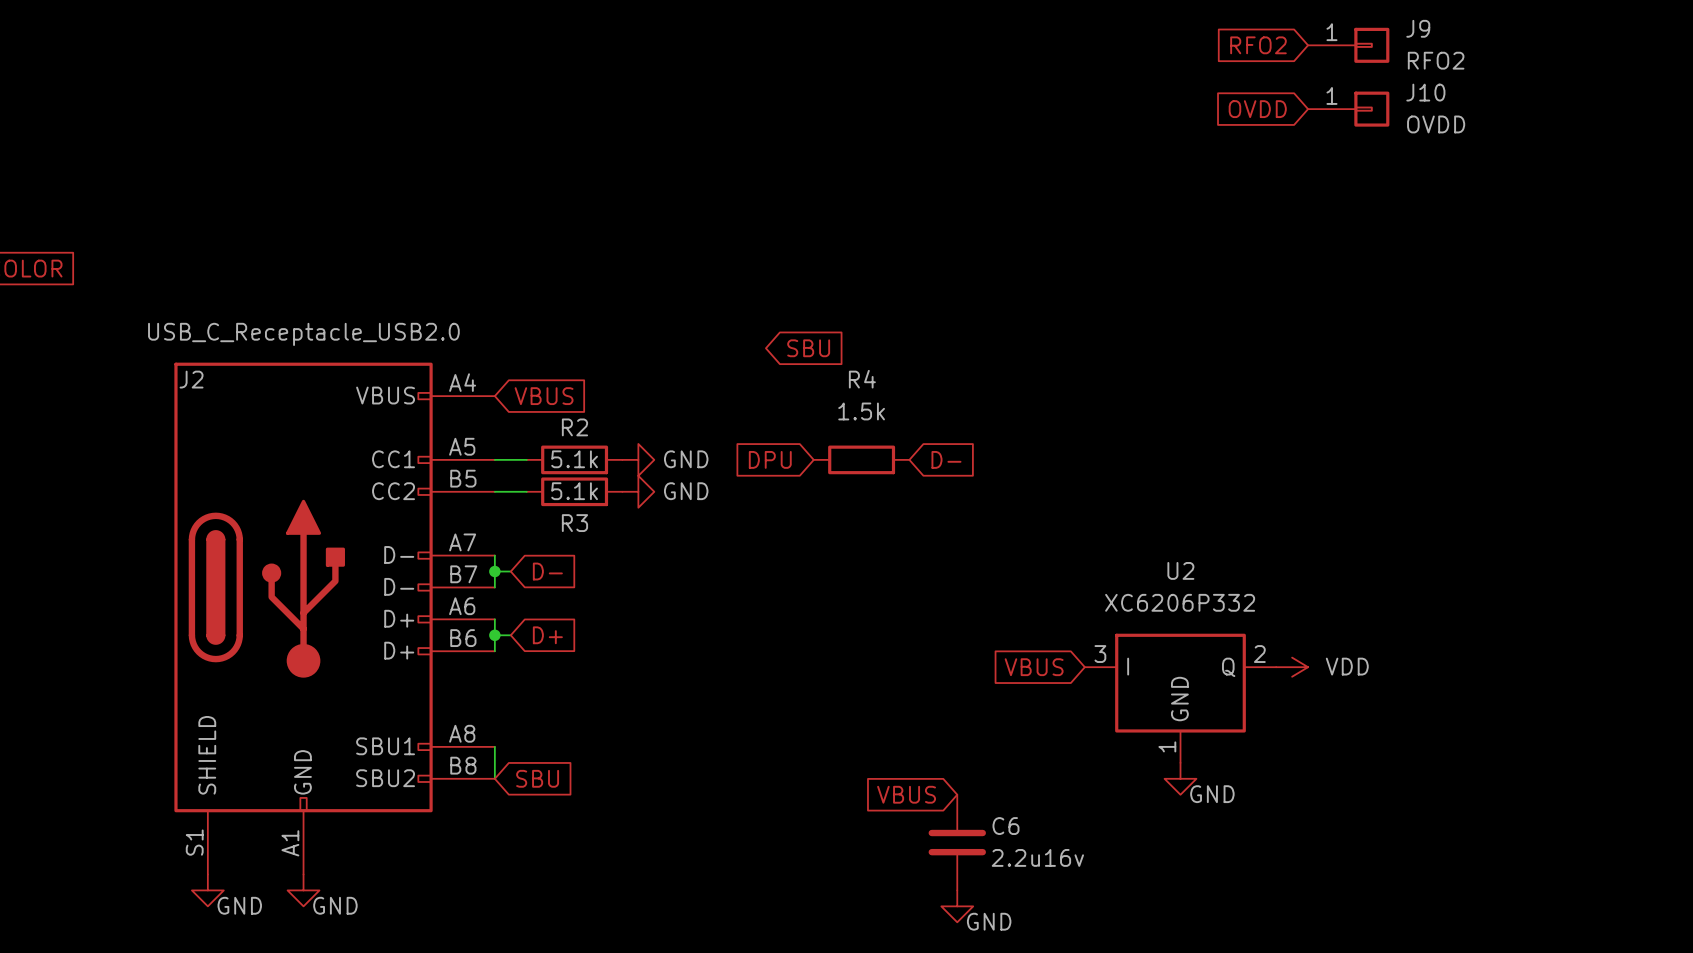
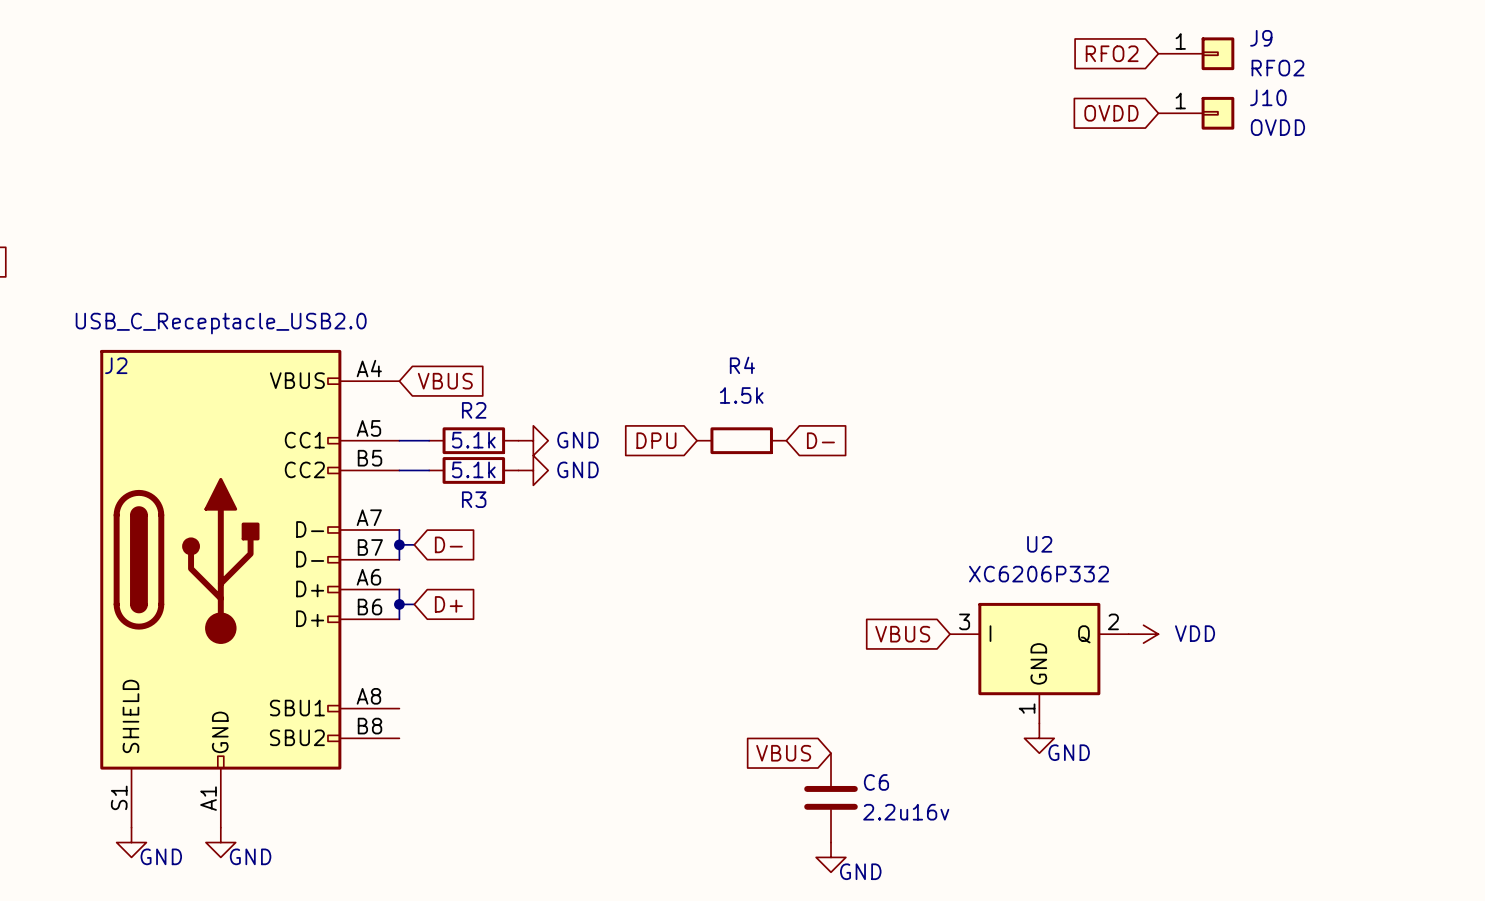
global label: SBU (808, 348) -> none
wire: (494, 746) (494, 778) -> none
global label: SBU (537, 778) -> none

